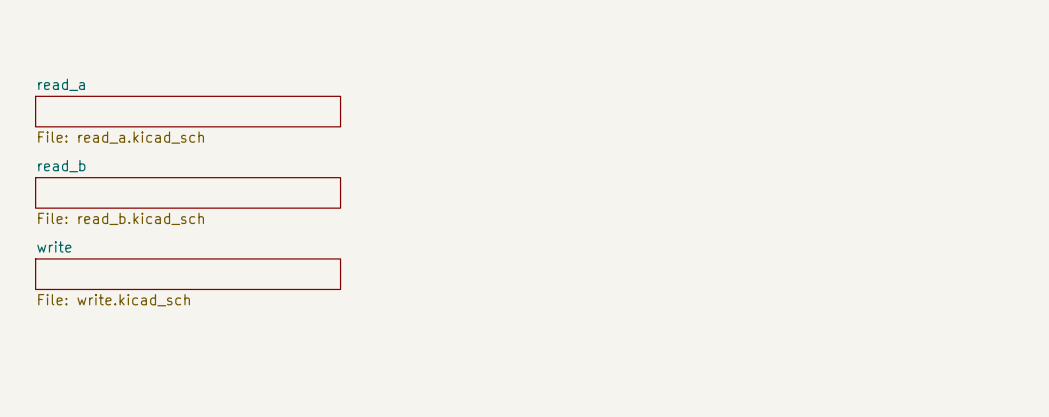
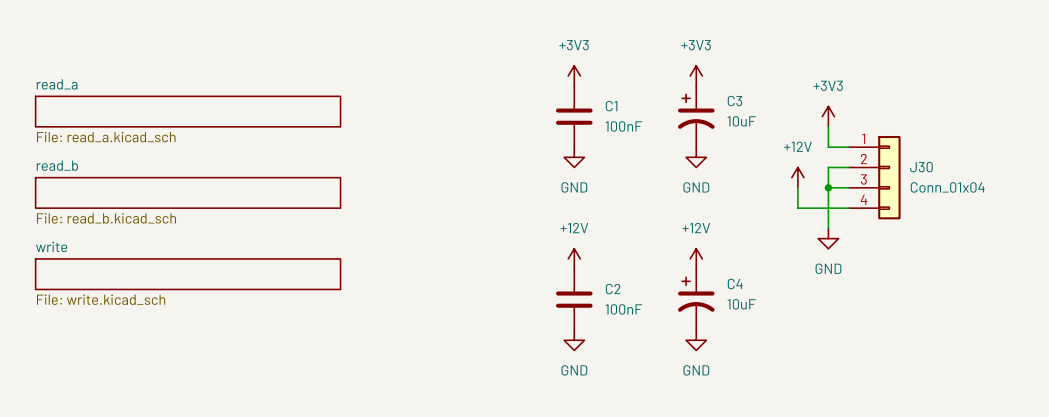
power symbol: none -> +3V3 (574, 76)
power symbol: none -> +3V3 (696, 76)
C1: none -> 100nF (574, 116)
C3: none -> 10uF (696, 116)
power symbol: none -> +3V3 (828, 116)
wire: none -> (828, 126) (828, 147) (848, 147)
power symbol: none -> GND (574, 157)
power symbol: none -> GND (696, 157)
wire: none -> (848, 167) (828, 167) (828, 228)
power symbol: none -> +12V (797, 177)
J30: none -> Conn_01x04 (874, 177)
wire: none -> (797, 187) (797, 208) (848, 208)
wire: none -> (828, 187) (848, 187)
junction: none -> (828, 187)
power symbol: none -> GND (828, 238)
power symbol: none -> +12V (574, 258)
power symbol: none -> +12V (696, 258)
C2: none -> 100nF (574, 299)
C4: none -> 10uF (696, 299)
power symbol: none -> GND (574, 340)
power symbol: none -> GND (696, 340)

